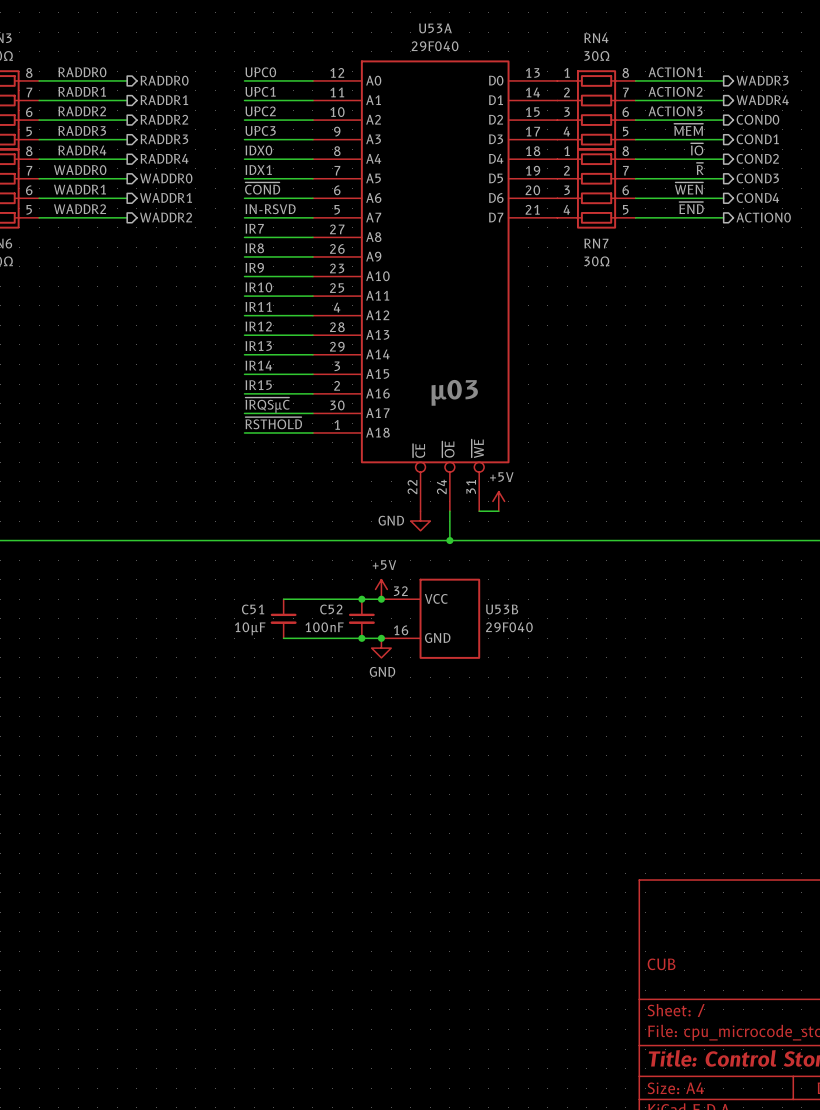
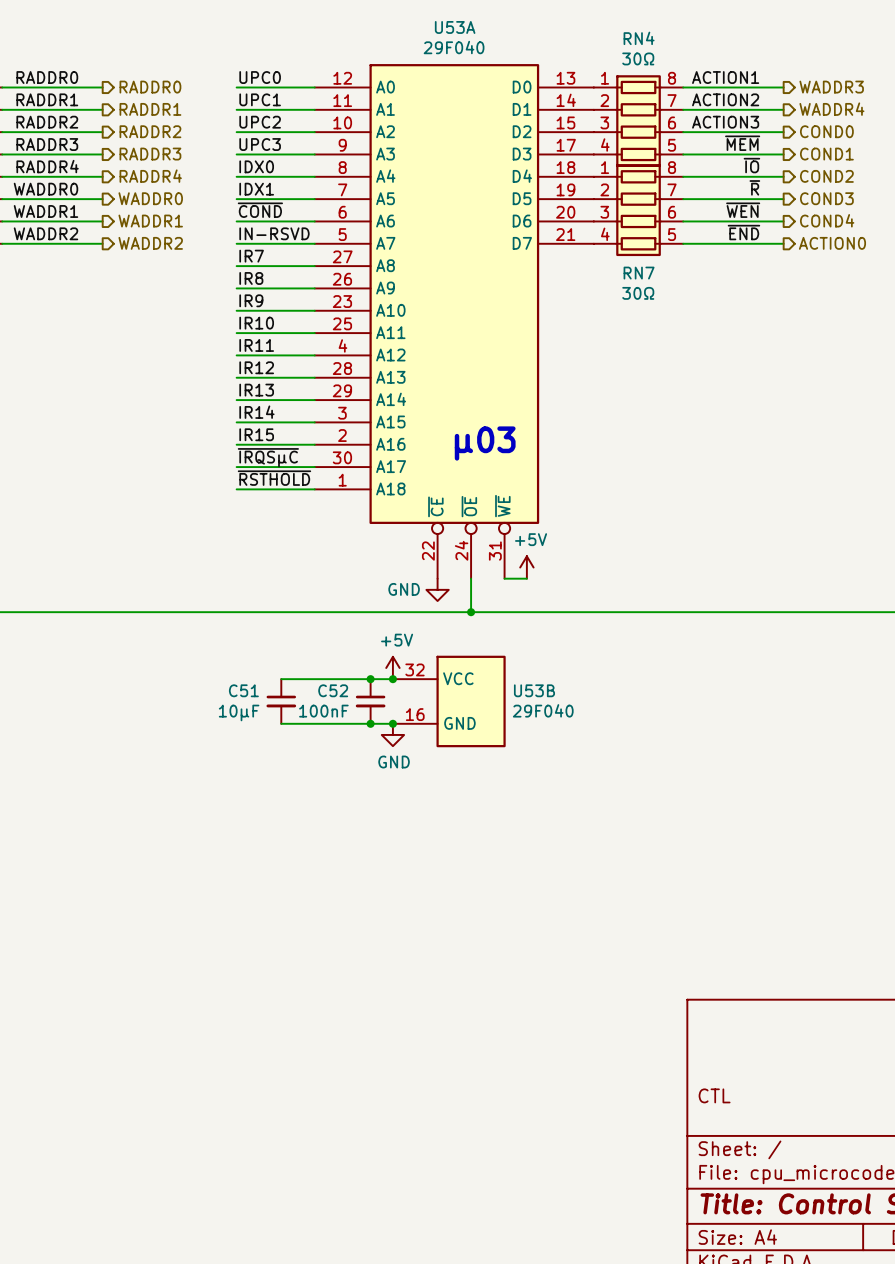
title block: CUB (661, 964) -> CTL (714, 1095)

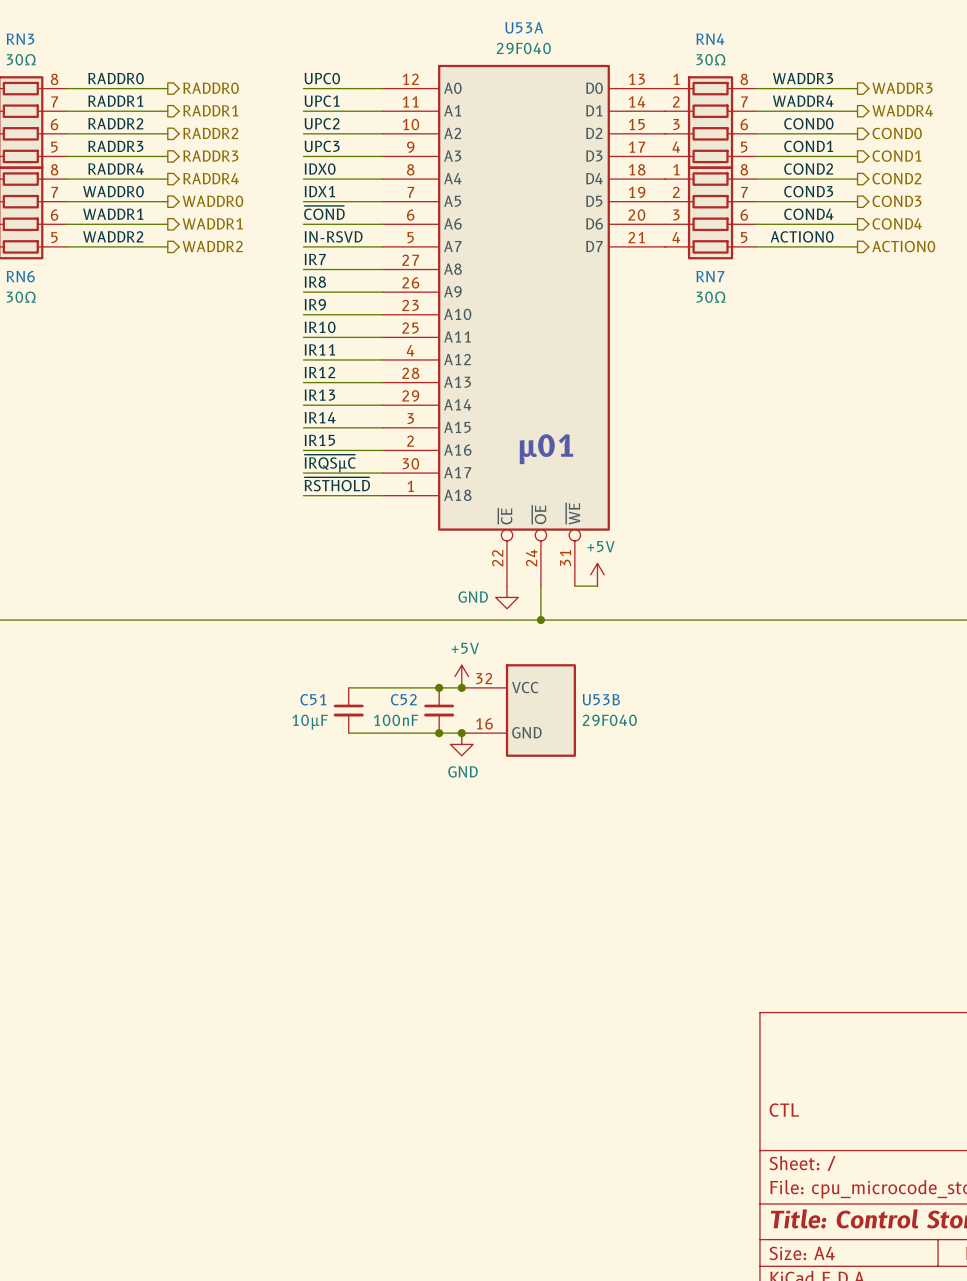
label: ACTION1 (725, 77) -> WADDR3 (803, 78)
label: ACTION2 (725, 99) -> WADDR4 (803, 101)
label: ACTION3 (725, 122) -> COND0 (808, 123)
label: ~{MEM} (742, 143) -> COND1 (808, 146)
label: ~{IO} (751, 165) -> COND2 (808, 169)
label: ~{R} (754, 187) -> COND3 (808, 191)
label: ~{WEN} (743, 210) -> COND4 (808, 214)
label: ~{END} (743, 232) -> ACTION0 (802, 236)
text: µ03 (485, 443) -> µ01 (546, 449)

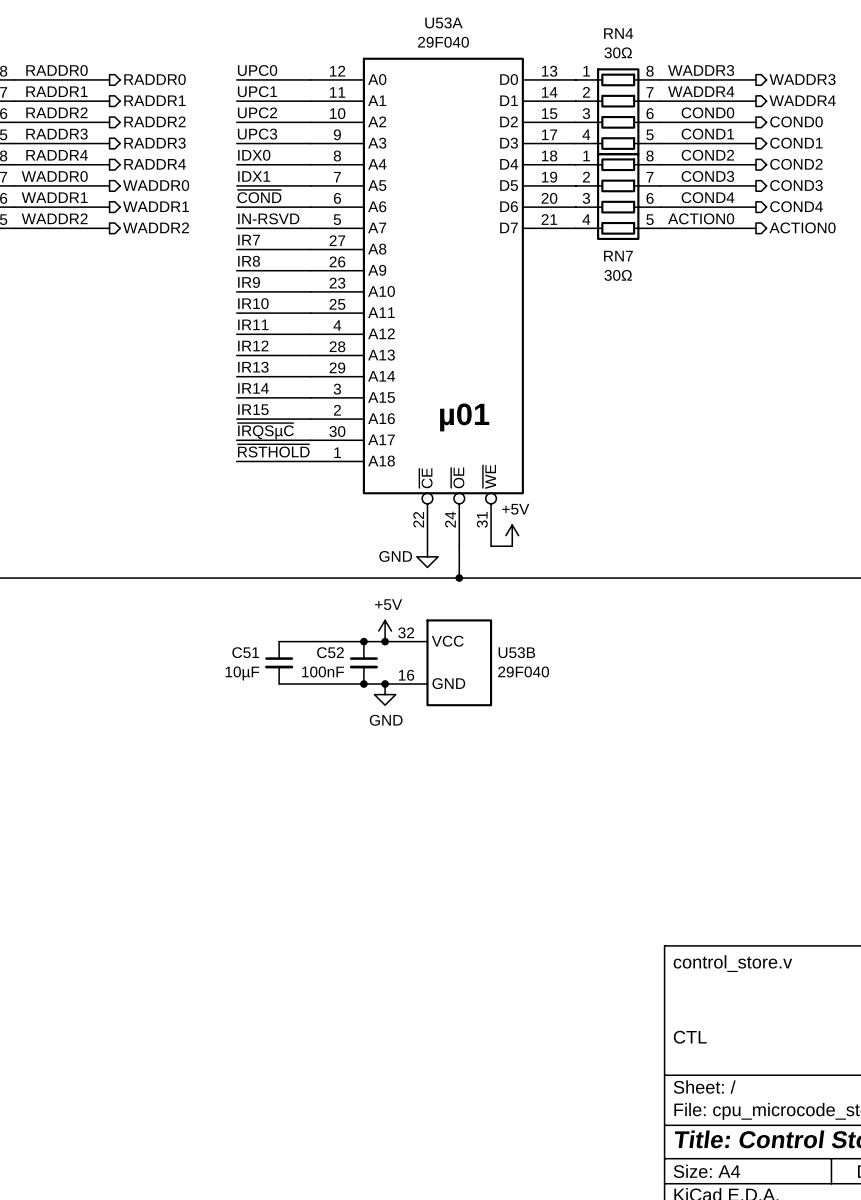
title block: none -> control_store.v (732, 963)

